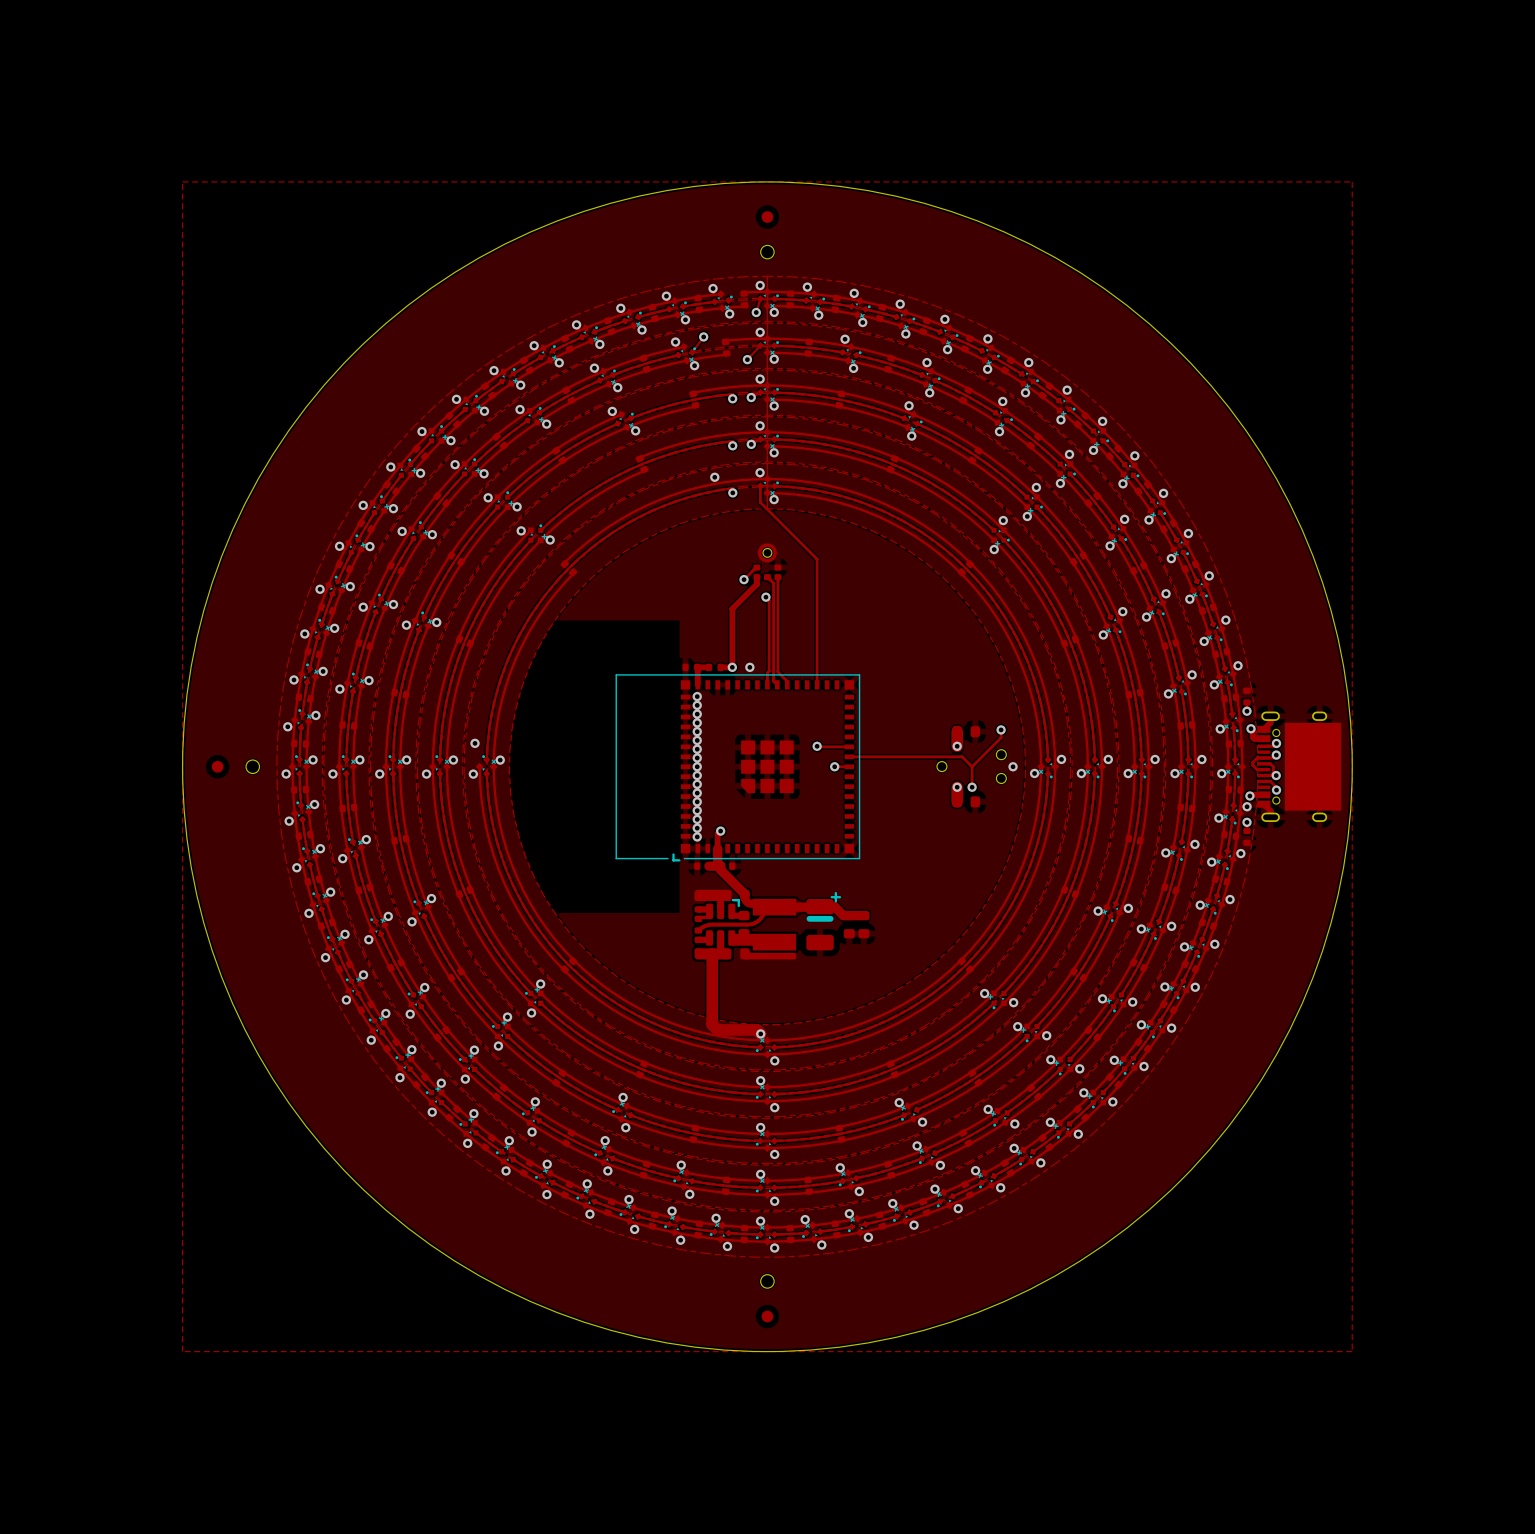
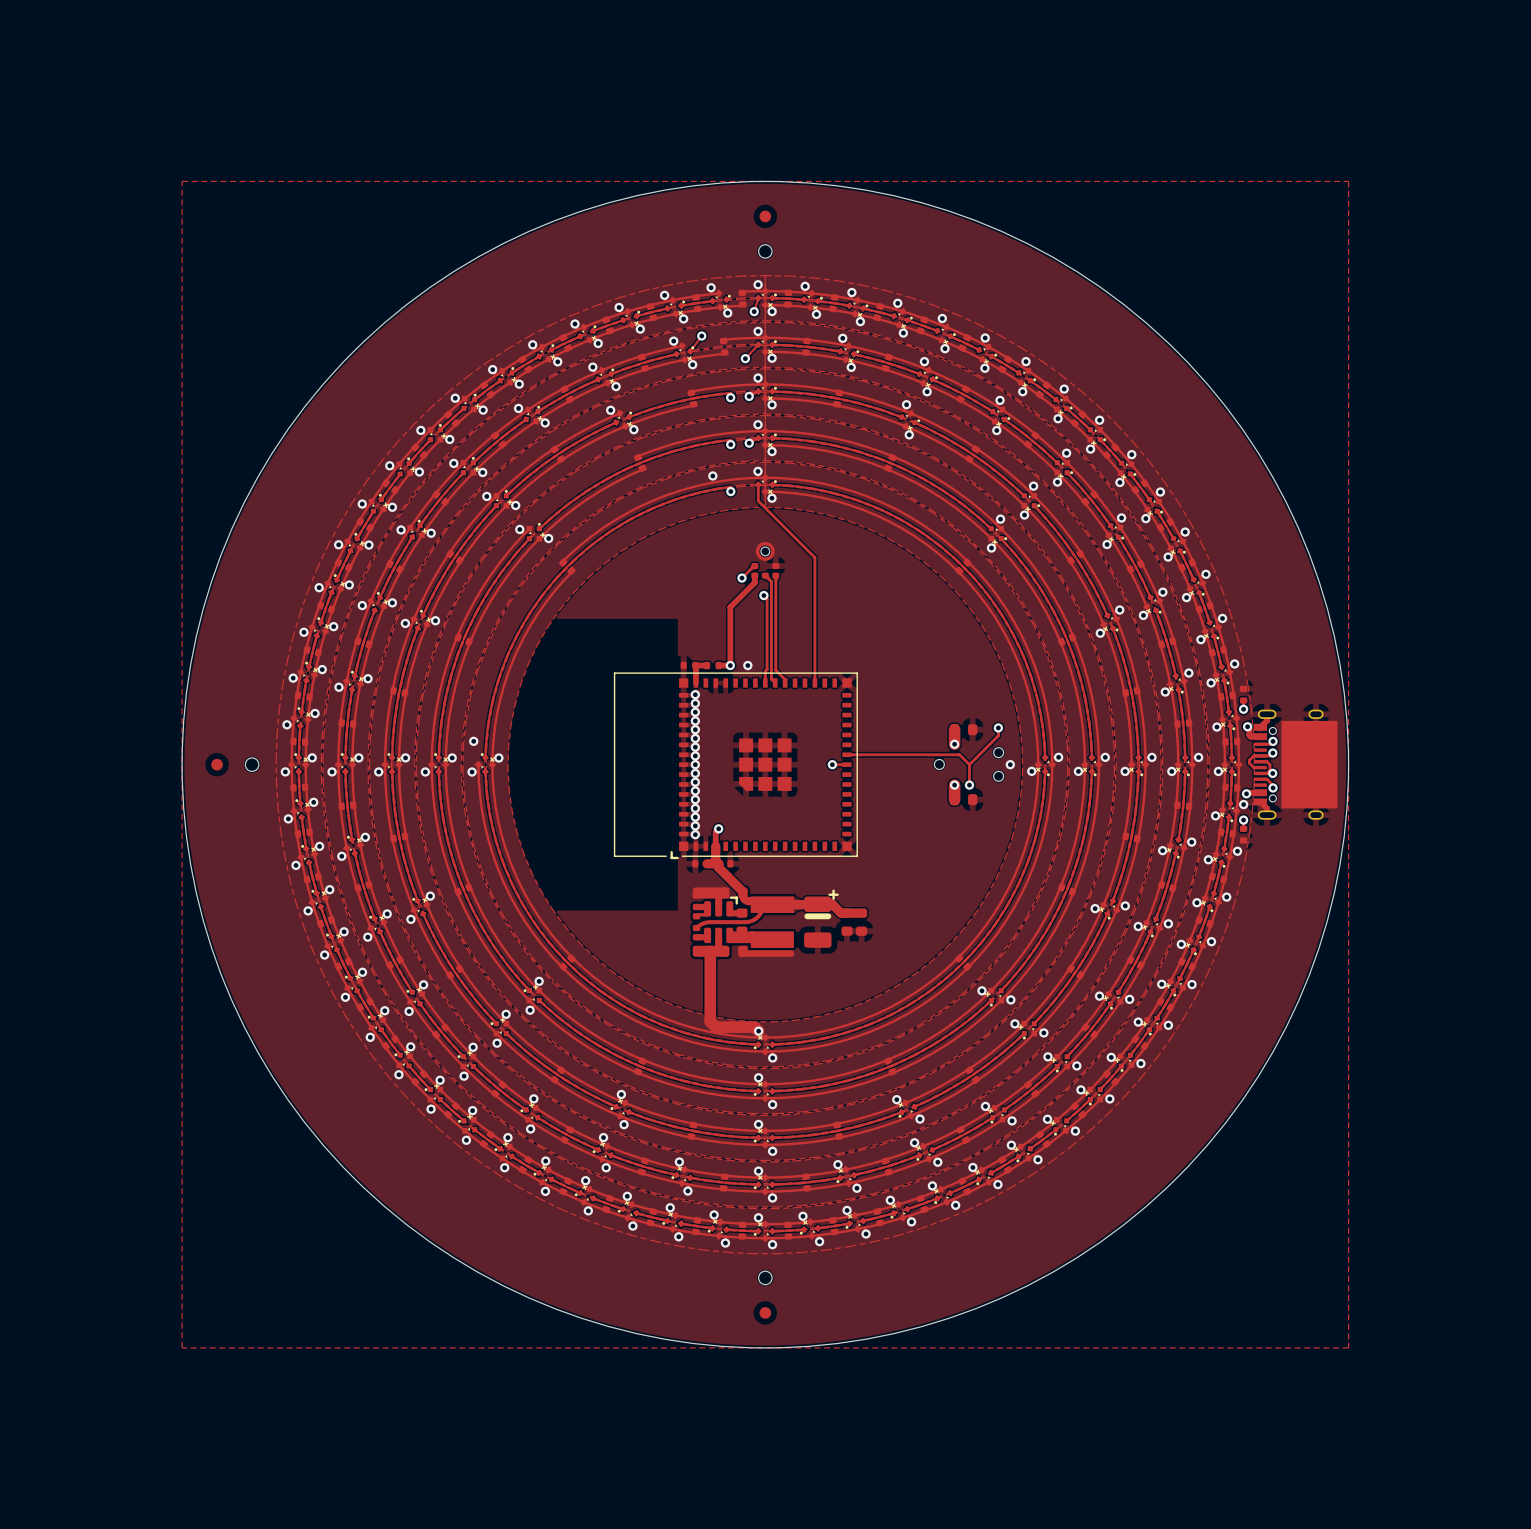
track: (817, 746) (849, 746) -> none
via: (817, 746) -> none

